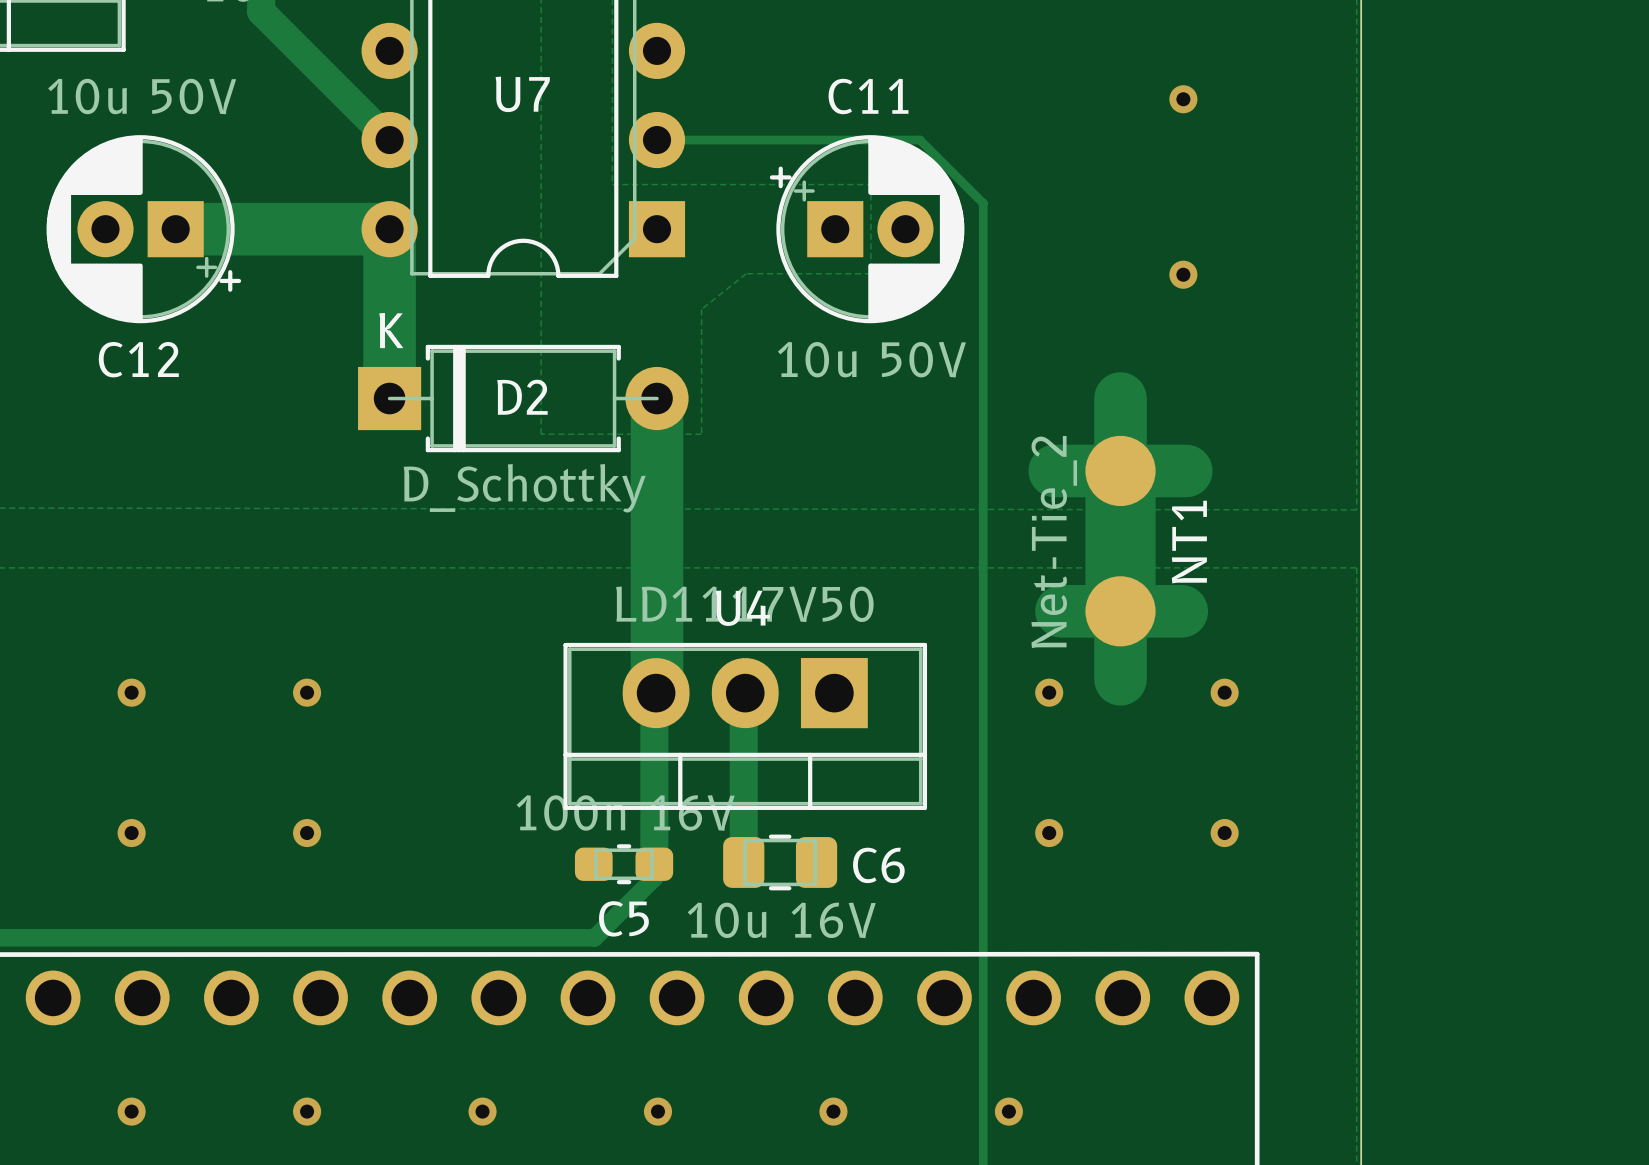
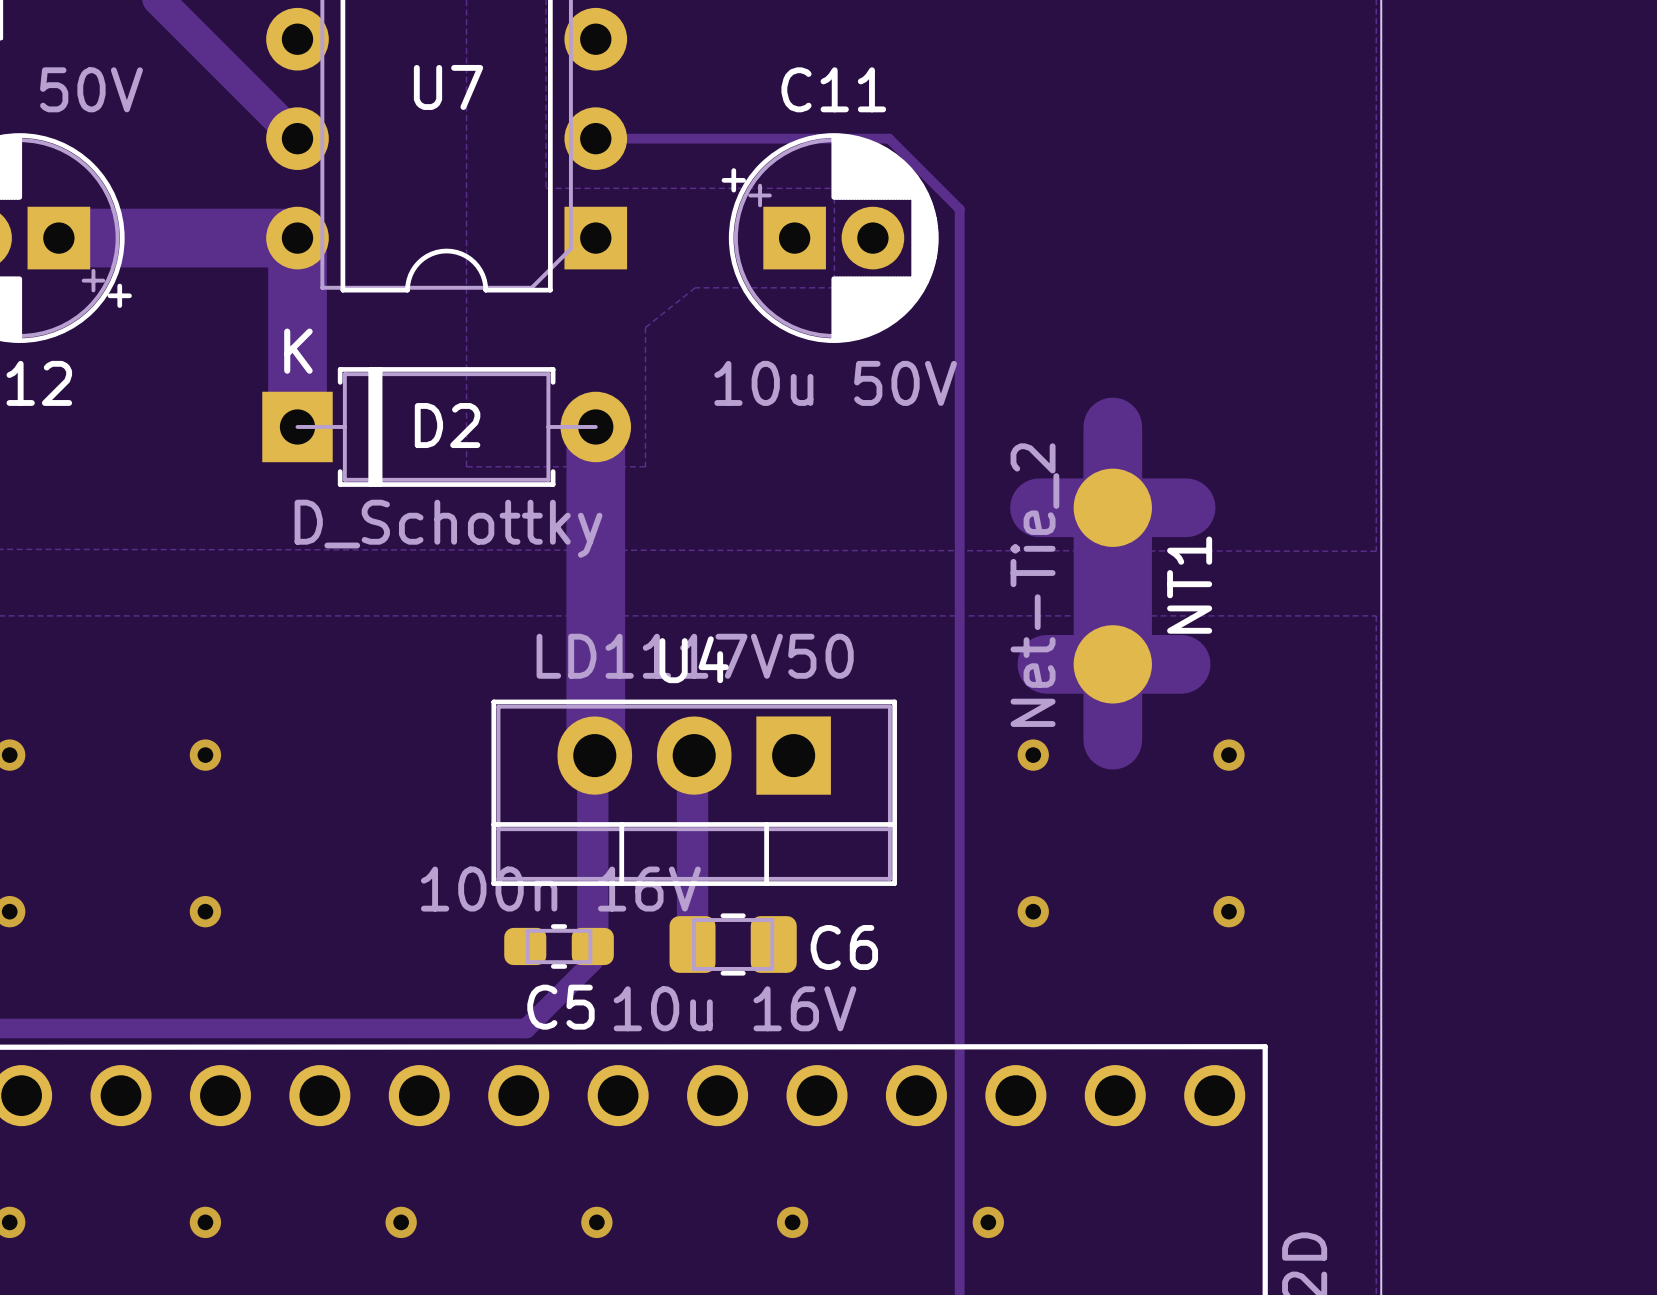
via: (1183, 99) -> none
via: (1183, 274) -> none

